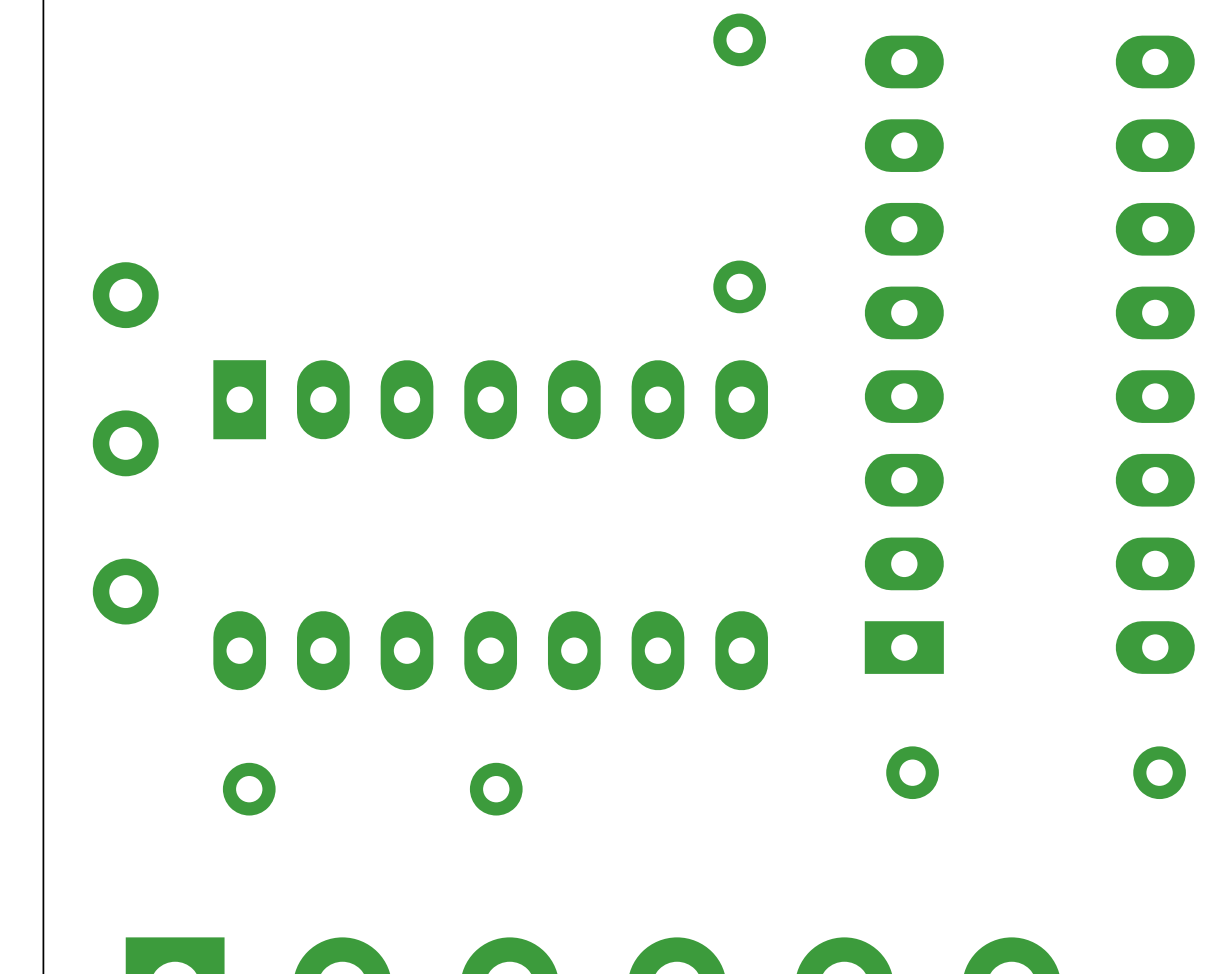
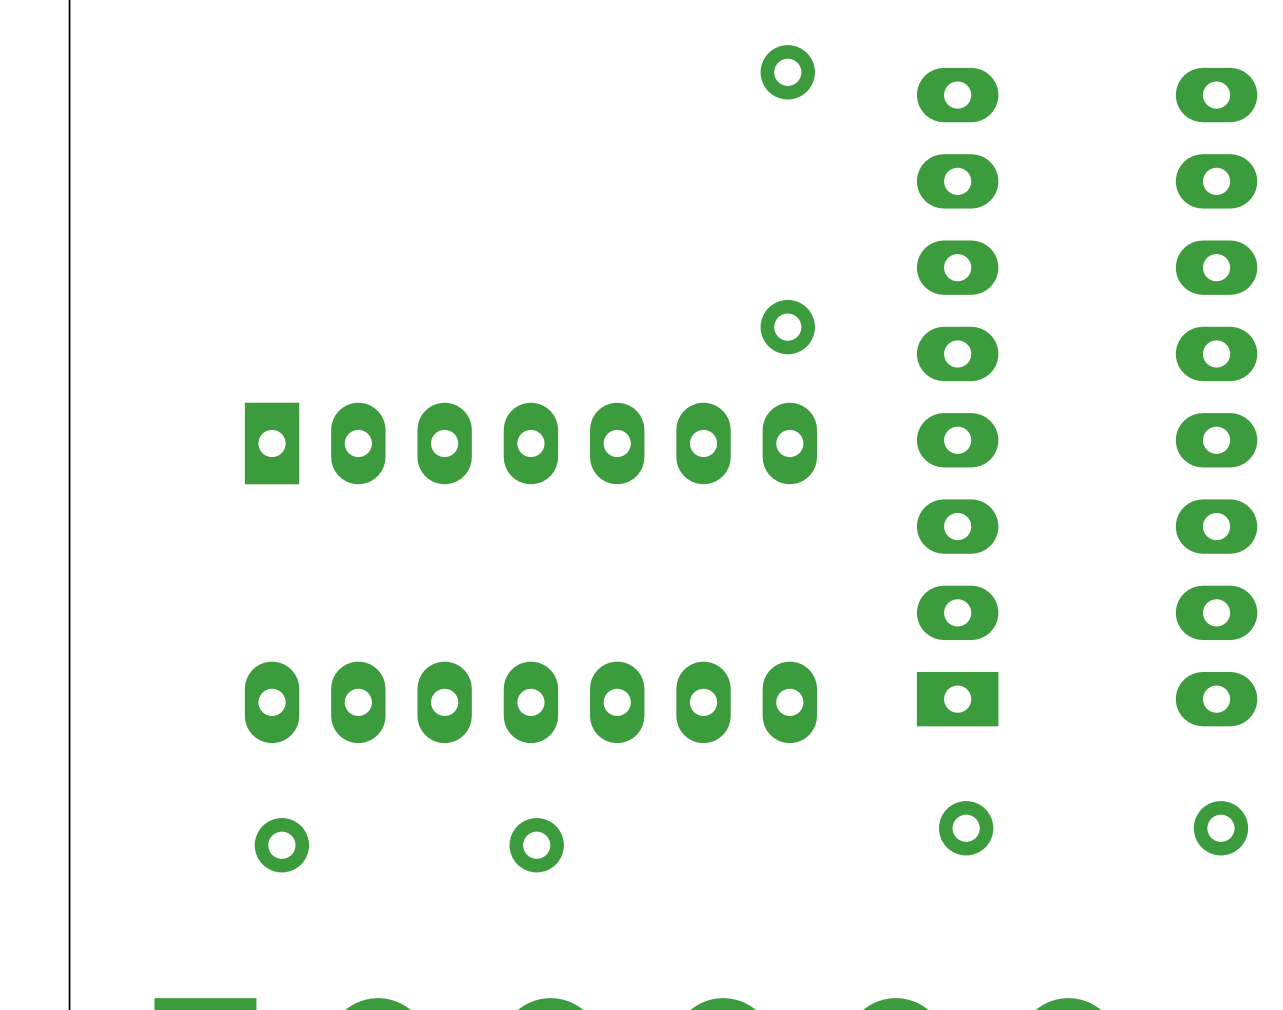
part: (125, 295) -> none
part: (125, 443) -> none
part: (125, 591) -> none

